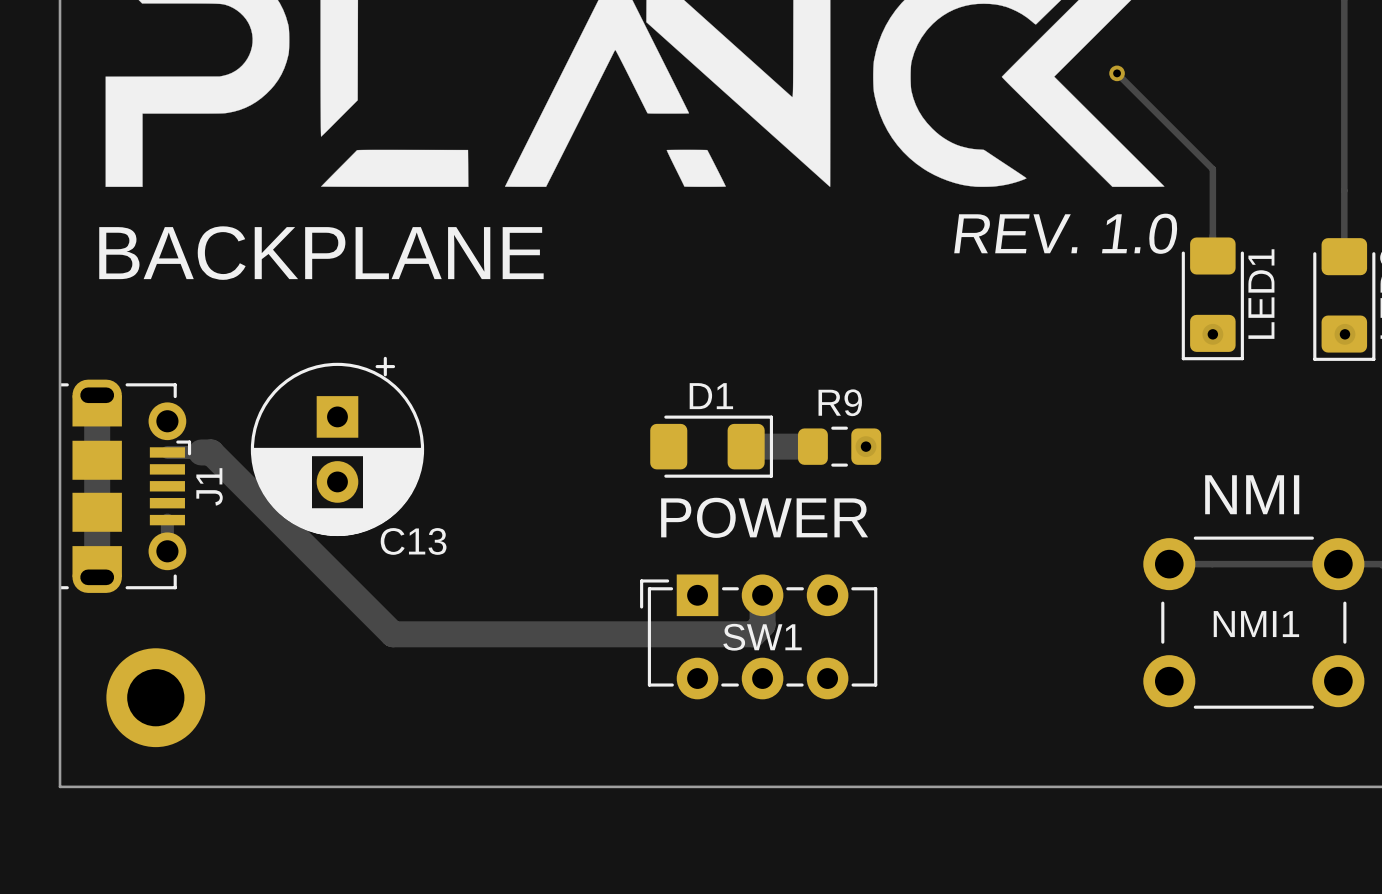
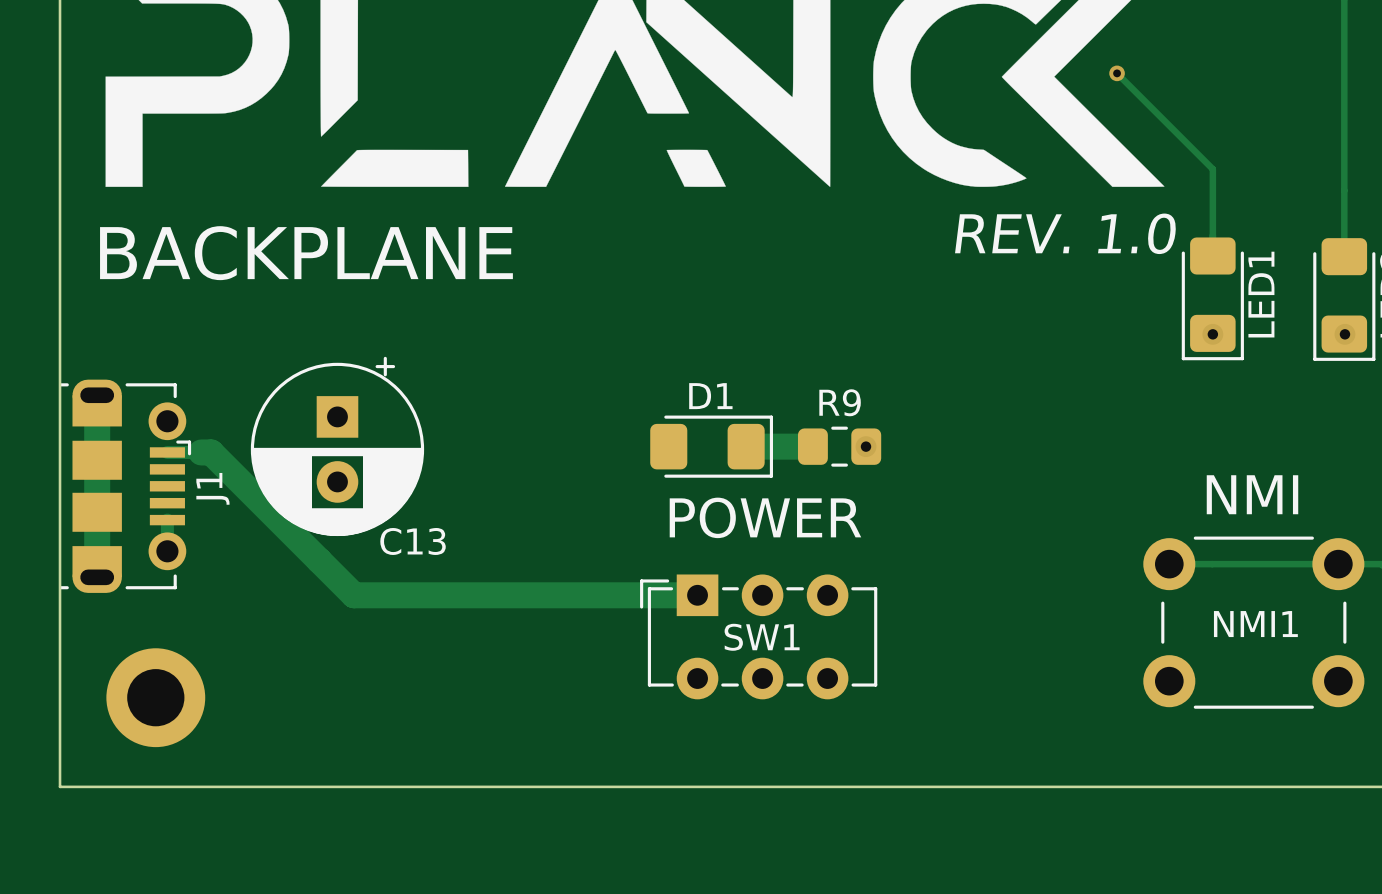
track: (354, 595) (393, 634) (752, 634) (762, 624) (762, 595) -> (354, 595) (697, 595)

